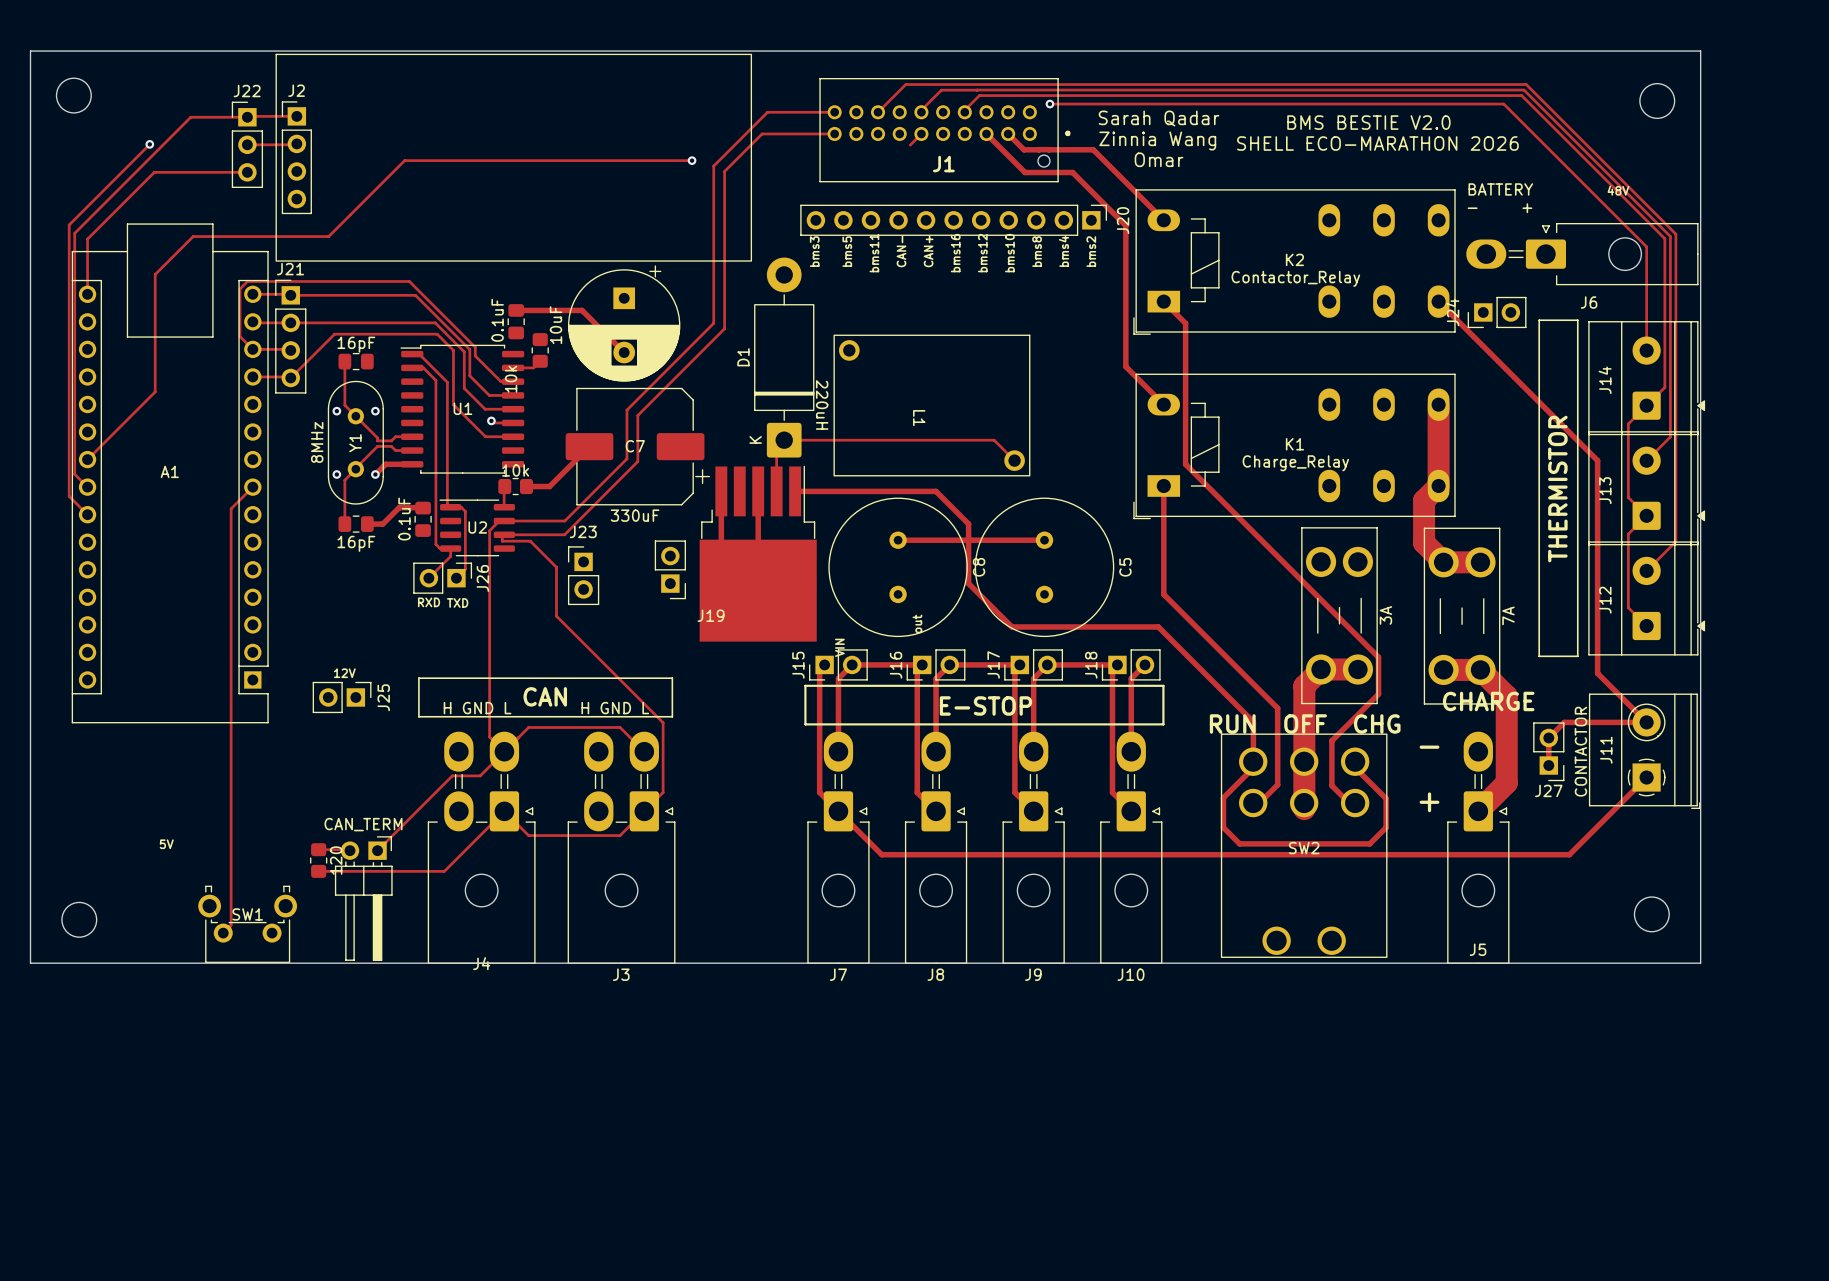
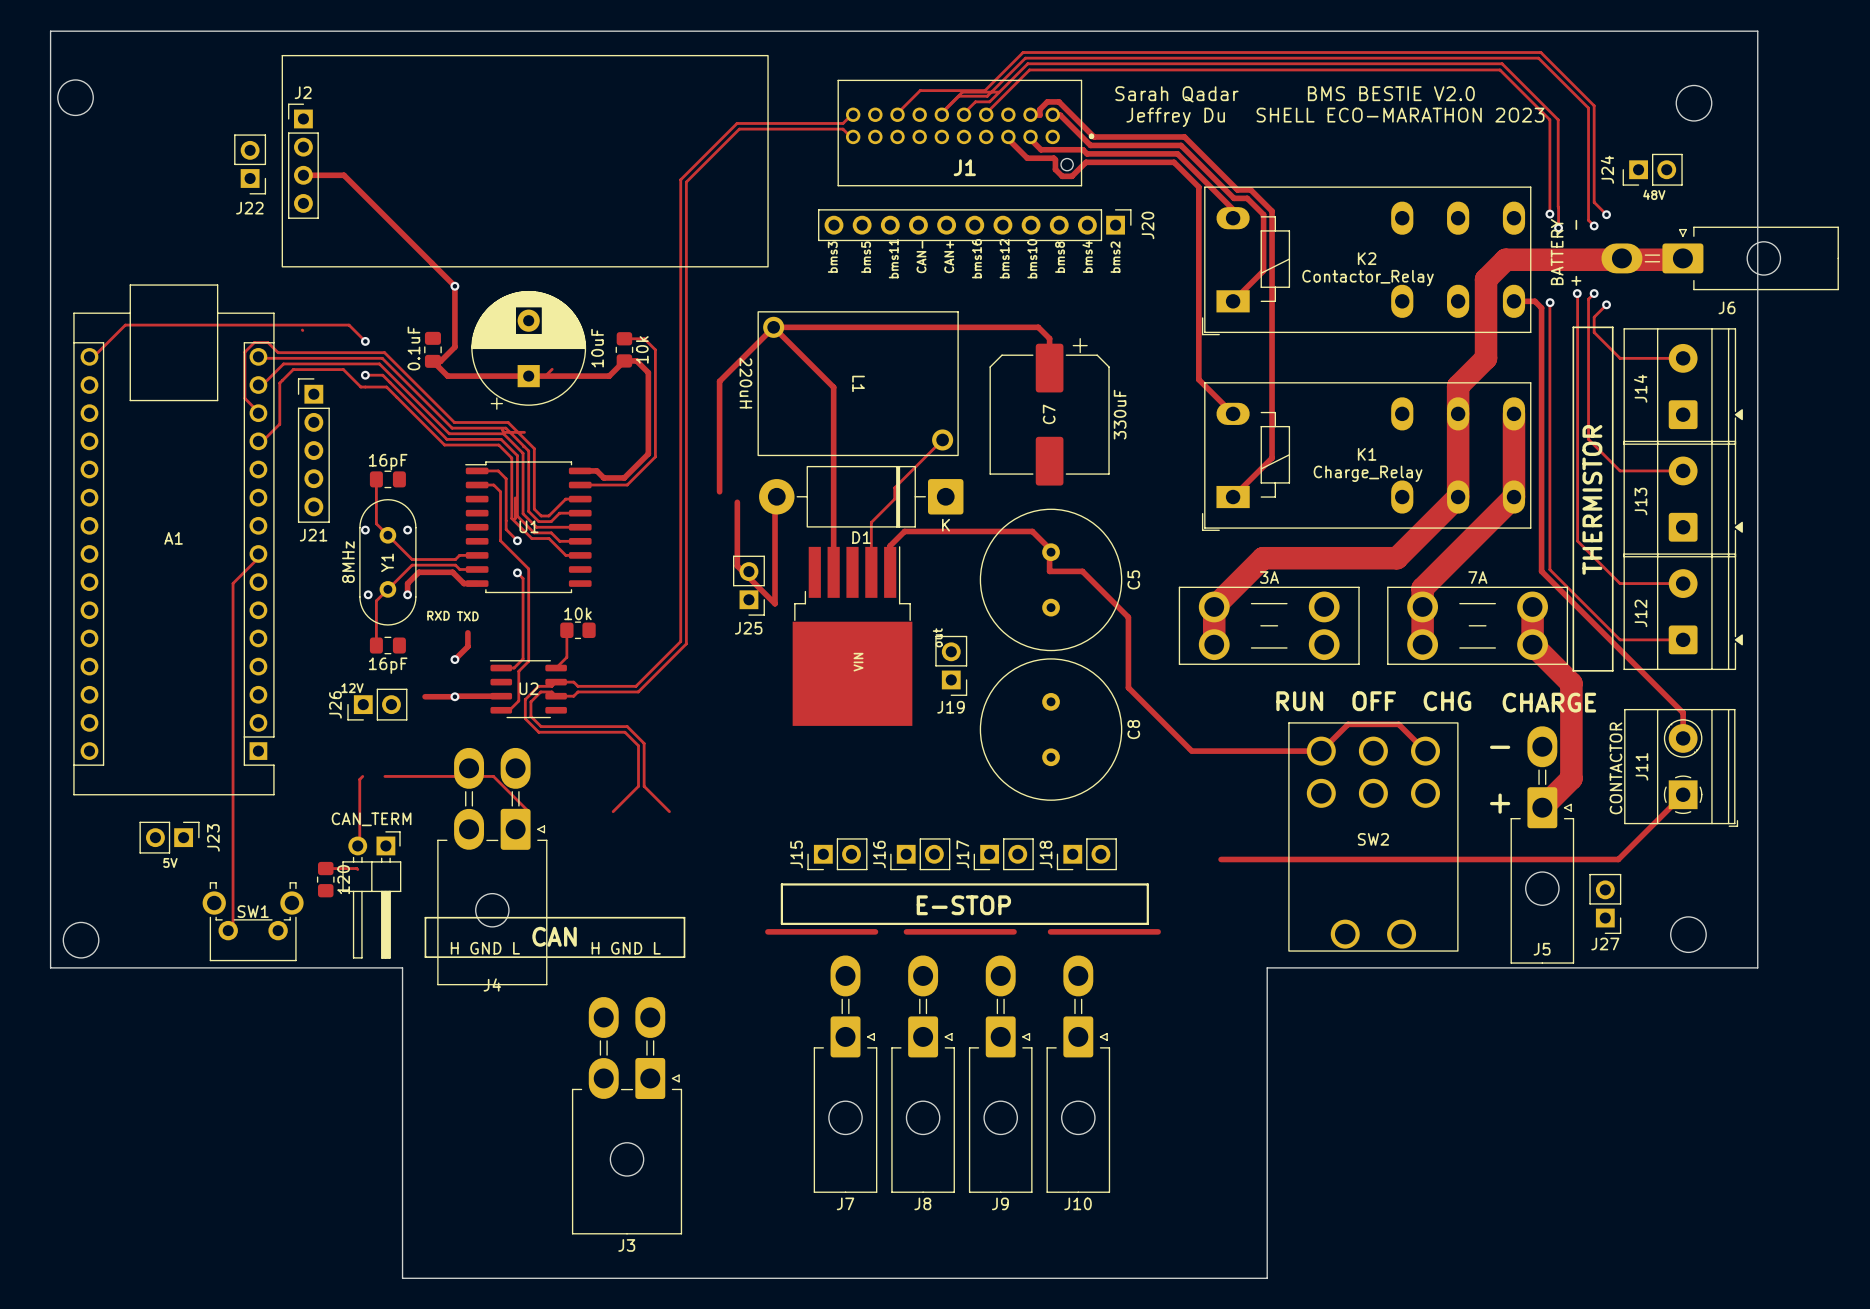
board edge: (30, 51) (1700, 51) (1700, 963) (30, 963) (30, 51) -> (50, 31) (50, 967) (402, 967) (402, 1278) (1267, 1278) (1267, 967) (1757, 967) (1757, 31) (50, 31)
track: (977, 90) (1523, 90) (1670, 236) (1670, 436) (1646, 460) -> (1594, 293) (1588, 299) (1588, 439) (1620, 470) (1683, 470)
J22 name position: J22 (247, 91) -> J22 (249, 208)
J22 footprint: [231, 101, 264, 188] -> [234, 134, 267, 195]
track: (1049, 104) (1503, 104) (1646, 246) (1646, 350) (1651, 345) -> none
via: (1049, 104) -> none
track: none -> (851, 115) (843, 123) (737, 123) (680, 179) (680, 641) (635, 686) (577, 686) (573, 682) (556, 682) (551, 686) (538, 686) (525, 699) (525, 718) (538, 732) (624, 732) (638, 745) (638, 786) (613, 811)
track: (834, 112) (767, 112) (713, 166) (713, 323) (626, 410) (626, 458) (564, 521) (499, 521) (489, 530) (489, 736) (504, 751) -> none
track: none -> (895, 115) (920, 90) (985, 90) (1023, 52) (1540, 52) (1594, 105) (1594, 202) (1606, 214)
track: (878, 112) (905, 84) (1526, 84) (1675, 234) (1675, 541) (1646, 570) -> (1577, 293) (1577, 541) (1620, 583) (1683, 583)
track: none -> (939, 115) (958, 96) (987, 96) (1025, 58) (1538, 58) (1588, 108) (1588, 220) (1594, 225)
track: none -> (962, 115) (975, 101) (989, 101) (1027, 63) (1502, 63) (1558, 119) (1558, 227)
track: none -> (984, 115) (1029, 69) (1500, 69) (1549, 119) (1549, 214)
track: (964, 112) (979, 95) (1521, 95) (1664, 238) (1664, 387) (1628, 423) (1628, 497) (1646, 515) (1628, 534) (1628, 607) (1646, 626) -> (1550, 302) (1549, 569) (1620, 639) (1683, 639)
track: none -> (1028, 115) (1039, 115) (1039, 109) (1047, 101) (1058, 101) (1094, 136) (1184, 136) (1237, 189) (1250, 189) (1272, 211) (1272, 458) (1233, 497)
track: none -> (1050, 115) (1060, 115) (1090, 145) (1181, 145) (1233, 198) (1247, 198) (1263, 214) (1263, 270) (1233, 301)
text: none -> SHELL ECO-MARATHON 2O23 (1400, 115)
text: none -> Jeffrey Du (1175, 117)
track: (296, 116) (190, 117) (74, 233) (74, 474) (87, 487) -> none
text position: Sarah Qadar (1159, 118) -> Sarah Qadar (1176, 94)
text position: BMS BESTIE V2.0 (1368, 122) -> BMS BESTIE V2.0 (1391, 93)
track: (834, 133) (762, 133) (724, 171) (724, 328) (637, 415) (637, 461) (564, 534) (504, 534) (502, 536) (502, 541) (530, 541) (556, 567) (556, 616) (663, 722) (663, 792) (620, 835) (528, 835) (504, 811) (444, 871) (318, 871) -> none
track: (921, 133) (910, 145) -> none
track: (986, 133) (1025, 172) (1039, 172) -> (1006, 137) (1027, 158) (1053, 158) (1055, 169) (1062, 176)
track: (1008, 133) (1024, 149) (1093, 149) (1163, 220) -> none
track: none -> (851, 137) (843, 129) (739, 129) (686, 182) (686, 643) (638, 691) (577, 691) (573, 696) (556, 696) (551, 691) (540, 691) (530, 701) (530, 716) (541, 726) (627, 726) (644, 743) (644, 786) (669, 811)
track: none -> (1028, 137) (1041, 149) (1082, 149) (1087, 153) (1177, 153) (1233, 209) (1233, 218)
text: Zinnia Wang (1157, 141) -> none
track: (296, 143) (247, 144) -> none
text: SHELL ECO-MARATHON 2O26 (1377, 143) -> none
track: (149, 144) (69, 224) (69, 496) (87, 514) -> none
via: (149, 144) -> none
text: Omar (1159, 159) -> none
track: (692, 160) (404, 160) (328, 236) (193, 236) (155, 274) (155, 391) (87, 459) -> none
via: (692, 160) -> none
track: none -> (303, 175) (343, 175) (454, 286) (454, 347) (440, 361) (432, 361) (447, 376) (609, 376) (624, 360) (636, 360) (648, 372) (648, 453) (624, 477) (603, 477) (596, 470) (580, 470)
track: (247, 172) (154, 172) (87, 239) (87, 294) -> none
track: (1048, 172) (1072, 172) (1125, 225) (1125, 366) (1163, 404) -> (1071, 176) (1085, 162) (1174, 162) (1198, 187) (1198, 379) (1233, 413)
text rotation: 0° (1500, 189) -> 90° counterclockwise (1557, 252)
text: - + (1500, 208) -> + - (1576, 252)
via: none -> (1549, 214)
via: none -> (1606, 214)
via: none -> (1594, 225)
via: none -> (1558, 227)
J6 position: (1582, 254) -> (1720, 258)
track: none -> (1683, 259) (1505, 259) (1486, 279) (1486, 358) (1458, 386) (1458, 497) (1396, 558) (1262, 558) (1214, 606) (1214, 644)
K2 position: (1294, 262) -> (1366, 260)
J21 name position: J21 (290, 269) -> J21 (313, 535)
J21 footprint: [275, 279, 307, 394] -> [297, 378, 330, 523]
via: none -> (454, 286)
via: none -> (1577, 293)
via: none -> (1594, 293)
track: (252, 294) (415, 295) (469, 349) (469, 375) (489, 395) (513, 395) -> none
track: none -> (1514, 301) (1534, 301) (1541, 307) (1541, 571) (1683, 712) (1683, 738)
via: none -> (1550, 302)
track: none -> (1606, 304) (1594, 317) (1594, 332) (1620, 358) (1683, 358)
via: none -> (1606, 304)
track: (1163, 301) (1185, 323) (1185, 464) (1378, 657) (1378, 694) (1331, 740) (1331, 785) (1355, 809) -> none
track: (1438, 301) (1597, 460) (1597, 673) (1646, 722) (1564, 722) (1548, 737) (1548, 765) -> none
track: (516, 310) (582, 310) (624, 352) -> none
J24 position: (1497, 312) -> (1652, 169)
track: none -> (773, 327) (833, 387) (833, 572)
track: none -> (773, 327) (1038, 327) (1049, 338) (1049, 368)
track: none -> (773, 327) (719, 381) (719, 491)
track: (252, 321) (435, 322) (464, 351) (464, 388) (485, 409) (513, 409) -> none
part: 0.1uF (516, 321) -> none
part rotation: 0° (624, 323) -> 180° (528, 350)
part position: (624, 323) -> (528, 350)
track: none -> (624, 338) (644, 338) (655, 349) (655, 456) (627, 485) (580, 485)
track: none -> (365, 341) (349, 325) (125, 325) (92, 358)
via: none -> (365, 341)
part: none -> 0.1uF (432, 349)
track: none -> (261, 358) (382, 358) (452, 428) (505, 428) (528, 450) (528, 511) (538, 521) (551, 521) (559, 513) (580, 513)
track: (290, 350) (252, 349) (240, 336) (240, 289) (247, 281) (409, 281) (475, 347) (475, 356) (500, 381) (513, 381) -> none
part position: (540, 350) -> (624, 349)
track: (412, 354) (419, 354) (447, 382) (447, 503) (450, 507) (461, 507) (465, 511) (465, 569) (456, 578) -> none
D1 rotation: 0° (784, 357) -> 90° counterclockwise (861, 496)
D1 position: (784, 357) -> (861, 496)
track: (344, 361) (344, 405) (377, 437) (377, 440) (391, 440) (395, 436) (412, 436) -> none
part: 16pF (356, 361) -> none
track: none -> (365, 375) (382, 375) (446, 439) (501, 439) (517, 455) (517, 516) (534, 532) (551, 532) (559, 541) (580, 541)
via: none -> (365, 375)
track: (412, 367) (423, 367) (435, 380) (435, 544) (440, 548) (450, 548) (450, 556) (428, 578) -> none
track: (252, 376) (290, 377) (334, 334) (437, 334) (453, 350) (453, 404) (485, 436) (513, 436) -> none
track: none -> (261, 386) (283, 363) (379, 363) (449, 433) (503, 433) (523, 453) (523, 513) (536, 527) (580, 527)
part value position: 10k (511, 379) -> 10k (642, 349)
track: (1438, 404) (1438, 485) (1424, 500) (1424, 542) (1443, 562) (1480, 562) -> none
track: none -> (1514, 413) (1514, 497) (1422, 588) (1422, 644)
track: none -> (261, 414) (244, 398) (244, 352) (254, 342) (267, 342) (278, 352) (384, 352) (454, 422) (508, 422) (534, 448) (534, 509) (541, 515) (548, 515) (565, 499) (580, 499)
L1 position: (931, 405) -> (858, 383)
U1 position: (462, 409) -> (528, 527)
via: (336, 411) -> none
via: (375, 411) -> none
track: none -> (279, 424) (261, 442)
track: none -> (279, 424) (279, 383) (293, 369) (343, 369) (360, 387) (386, 387) (444, 445) (498, 445) (511, 457) (511, 518) (531, 538) (548, 538) (565, 555) (580, 555)
L1 name position: L1 (919, 418) -> L1 (858, 383)
via: (491, 420) -> none
track: none -> (942, 439) (894, 487) (894, 499) (871, 522) (871, 572)
Y1 position: (355, 442) -> (387, 562)
track: (589, 446) (549, 486) (526, 486) -> none
C7 rotation: 0° (637, 446) -> 90° counterclockwise (1049, 411)
C7 position: (637, 446) -> (1049, 411)
K1 position: (1294, 446) -> (1366, 456)
track: (412, 450) (395, 450) (391, 446) (377, 446) (355, 468) (344, 480) (344, 524) -> none
track: none -> (477, 470) (498, 470) (506, 478) (506, 529) (517, 540)
track: (1014, 460) (994, 440) (784, 440) (776, 447) (776, 491) -> none
track: (412, 464) (385, 464) (375, 474) -> none
track: none -> (376, 479) (376, 523) (412, 559) (455, 559) (459, 555) (477, 555)
part: none -> 16pF (387, 479)
A1 position: (170, 473) -> (173, 539)
via: (336, 474) -> none
via: (375, 474) -> none
track: none -> (477, 485) (493, 485) (500, 491) (500, 540) (528, 568) (528, 661) (518, 671) (518, 700) (509, 710) (501, 710)
track: (1163, 485) (1163, 594) (1277, 708) (1277, 784) (1253, 809) -> none
part: 10k (515, 486) -> none
track: (252, 487) (231, 508) (231, 925) (223, 933) -> none
track: (795, 491) (936, 491) (968, 523) (968, 583) (1011, 626) (1158, 626) (1253, 721) (1253, 767) (1223, 797) (1223, 827) (1239, 843) (1369, 843) (1386, 827) (1386, 798) (1355, 767) -> none
track: (423, 508) (399, 507) (382, 524) (367, 524) -> none
via: none -> (365, 530)
via: none -> (407, 530)
part: 0.1uF (423, 519) -> none
part: 16pF (356, 524) -> none
U2 position: (477, 527) -> (528, 689)
via: none -> (517, 540)
track: (898, 540) (1044, 540) -> none
track: none -> (261, 555) (233, 583) (233, 925) (225, 932)
part position: (758, 553) -> (852, 636)
track: none -> (477, 569) (459, 569) (455, 565) (412, 565) (376, 600) (376, 645)
track: none -> (890, 572) (890, 545) (904, 531) (1032, 531) (1049, 548) (1049, 571) (1082, 571) (1128, 617) (1128, 687) (1191, 751) (1321, 751) (1348, 724) (1398, 724) (1425, 751)
track: none -> (517, 572) (523, 578) (523, 659) (514, 668) (501, 668)
via: none -> (517, 572)
C8 position: (898, 567) -> (1051, 729)
C5 position: (1044, 567) -> (1051, 579)
J19 position: (670, 569) -> (951, 665)
track: none -> (477, 583) (463, 583) (452, 572) (418, 572) (407, 583) (407, 594)
J23 rotation: 0° (583, 575) -> 90° clockwise (169, 837)
J23 position: (583, 575) -> (169, 837)
J26 rotation: 0° (442, 578) -> 180° (377, 704)
J26 position: (442, 578) -> (377, 704)
via: none -> (368, 594)
via: none -> (407, 594)
track: none -> (1532, 606) (1532, 644) (1571, 683) (1571, 778) (1542, 807)
J19 name position: J19 (711, 615) -> J19 (951, 707)
part rotation: 0° (1339, 615) -> 90° clockwise (1269, 625)
part value position: 3A (1385, 615) -> 3A (1269, 577)
part value position: 7A (1508, 615) -> 7A (1477, 577)
track: none -> (566, 630) (566, 657) (556, 668)
part: none -> 10k (577, 630)
part rotation: 0° (1462, 616) -> 90° clockwise (1477, 625)
track: none -> (467, 632) (467, 646) (454, 659)
part: none -> 16pF (387, 645)
via: none -> (454, 659)
track: (824, 664) (819, 669) (819, 792) (881, 854) (1569, 854) (1583, 840) -> (1221, 859) (1618, 859)
J15 position: (838, 664) -> (837, 854)
J16 position: (936, 664) -> (920, 854)
J17 position: (1033, 664) -> (1003, 854)
J18 position: (1131, 664) -> (1086, 854)
track: (1144, 664) (1131, 678) (1131, 751) -> none
track: (1357, 669) (1321, 669) (1304, 686) (1304, 809) -> none
track: (1443, 669) (1480, 669) (1506, 696) (1506, 782) (1478, 811) -> none
line: (418, 678) (672, 678) (672, 716) (418, 716) (418, 678) -> (425, 917) (684, 917) (684, 957) (425, 957) (425, 917)
via: none -> (454, 696)
track: none -> (501, 696) (425, 696)
line: (805, 685) (1163, 685) (1163, 724) (805, 724) (805, 685) -> (781, 884) (1147, 884) (1147, 923) (781, 923) (781, 884)
text position: CAN (545, 696) -> CAN (554, 936)
J25 rotation: 0° (342, 697) -> 90° clockwise (748, 585)
J25 position: (342, 697) -> (748, 585)
text position: CHARGE (1488, 701) -> CHARGE (1549, 702)
text position: E-STOP (985, 705) -> E-STOP (963, 905)
text: H GND L (477, 708) -> none
text: H GND L (615, 708) -> none
text position: RUN OFF CHG (1305, 723) -> RUN OFF CHG (1373, 701)
text position: - (1429, 747) -> - (1500, 747)
track: (644, 751) (620, 727) (528, 727) (480, 775) (452, 775) (377, 850) -> none
track: (838, 751) (838, 678) (852, 664) (922, 664) (917, 669) (917, 792) (936, 811) -> none
track: (936, 751) (936, 678) (949, 664) (1019, 664) (1014, 669) (1014, 792) (1033, 811) -> none
track: (1033, 751) (1033, 678) (1047, 664) (1117, 664) (1112, 669) (1112, 792) (1131, 811) -> none
J27 position: (1548, 751) -> (1605, 903)
track: none -> (362, 776) (359, 779) (359, 851)
track: none -> (384, 776) (493, 776) (528, 811)
text position: + (1429, 802) -> + (1500, 803)
SW2 position: (1304, 845) -> (1373, 836)
J3 position: (621, 847) -> (627, 1115)
J7 position: (838, 847) -> (845, 1074)
J8 position: (936, 847) -> (923, 1074)
J9 position: (1033, 847) -> (1000, 1074)
J10 position: (1131, 847) -> (1078, 1074)
J5 position: (1478, 847) -> (1542, 844)
part position: (363, 898) -> (371, 894)
track: none -> (767, 931) (875, 931)
track: none -> (906, 931) (1014, 931)
track: none -> (1050, 931) (1158, 931)
SW1 position: (247, 924) -> (253, 921)
text: none -> H GND L (485, 948)
text: none -> H GND L (626, 948)

